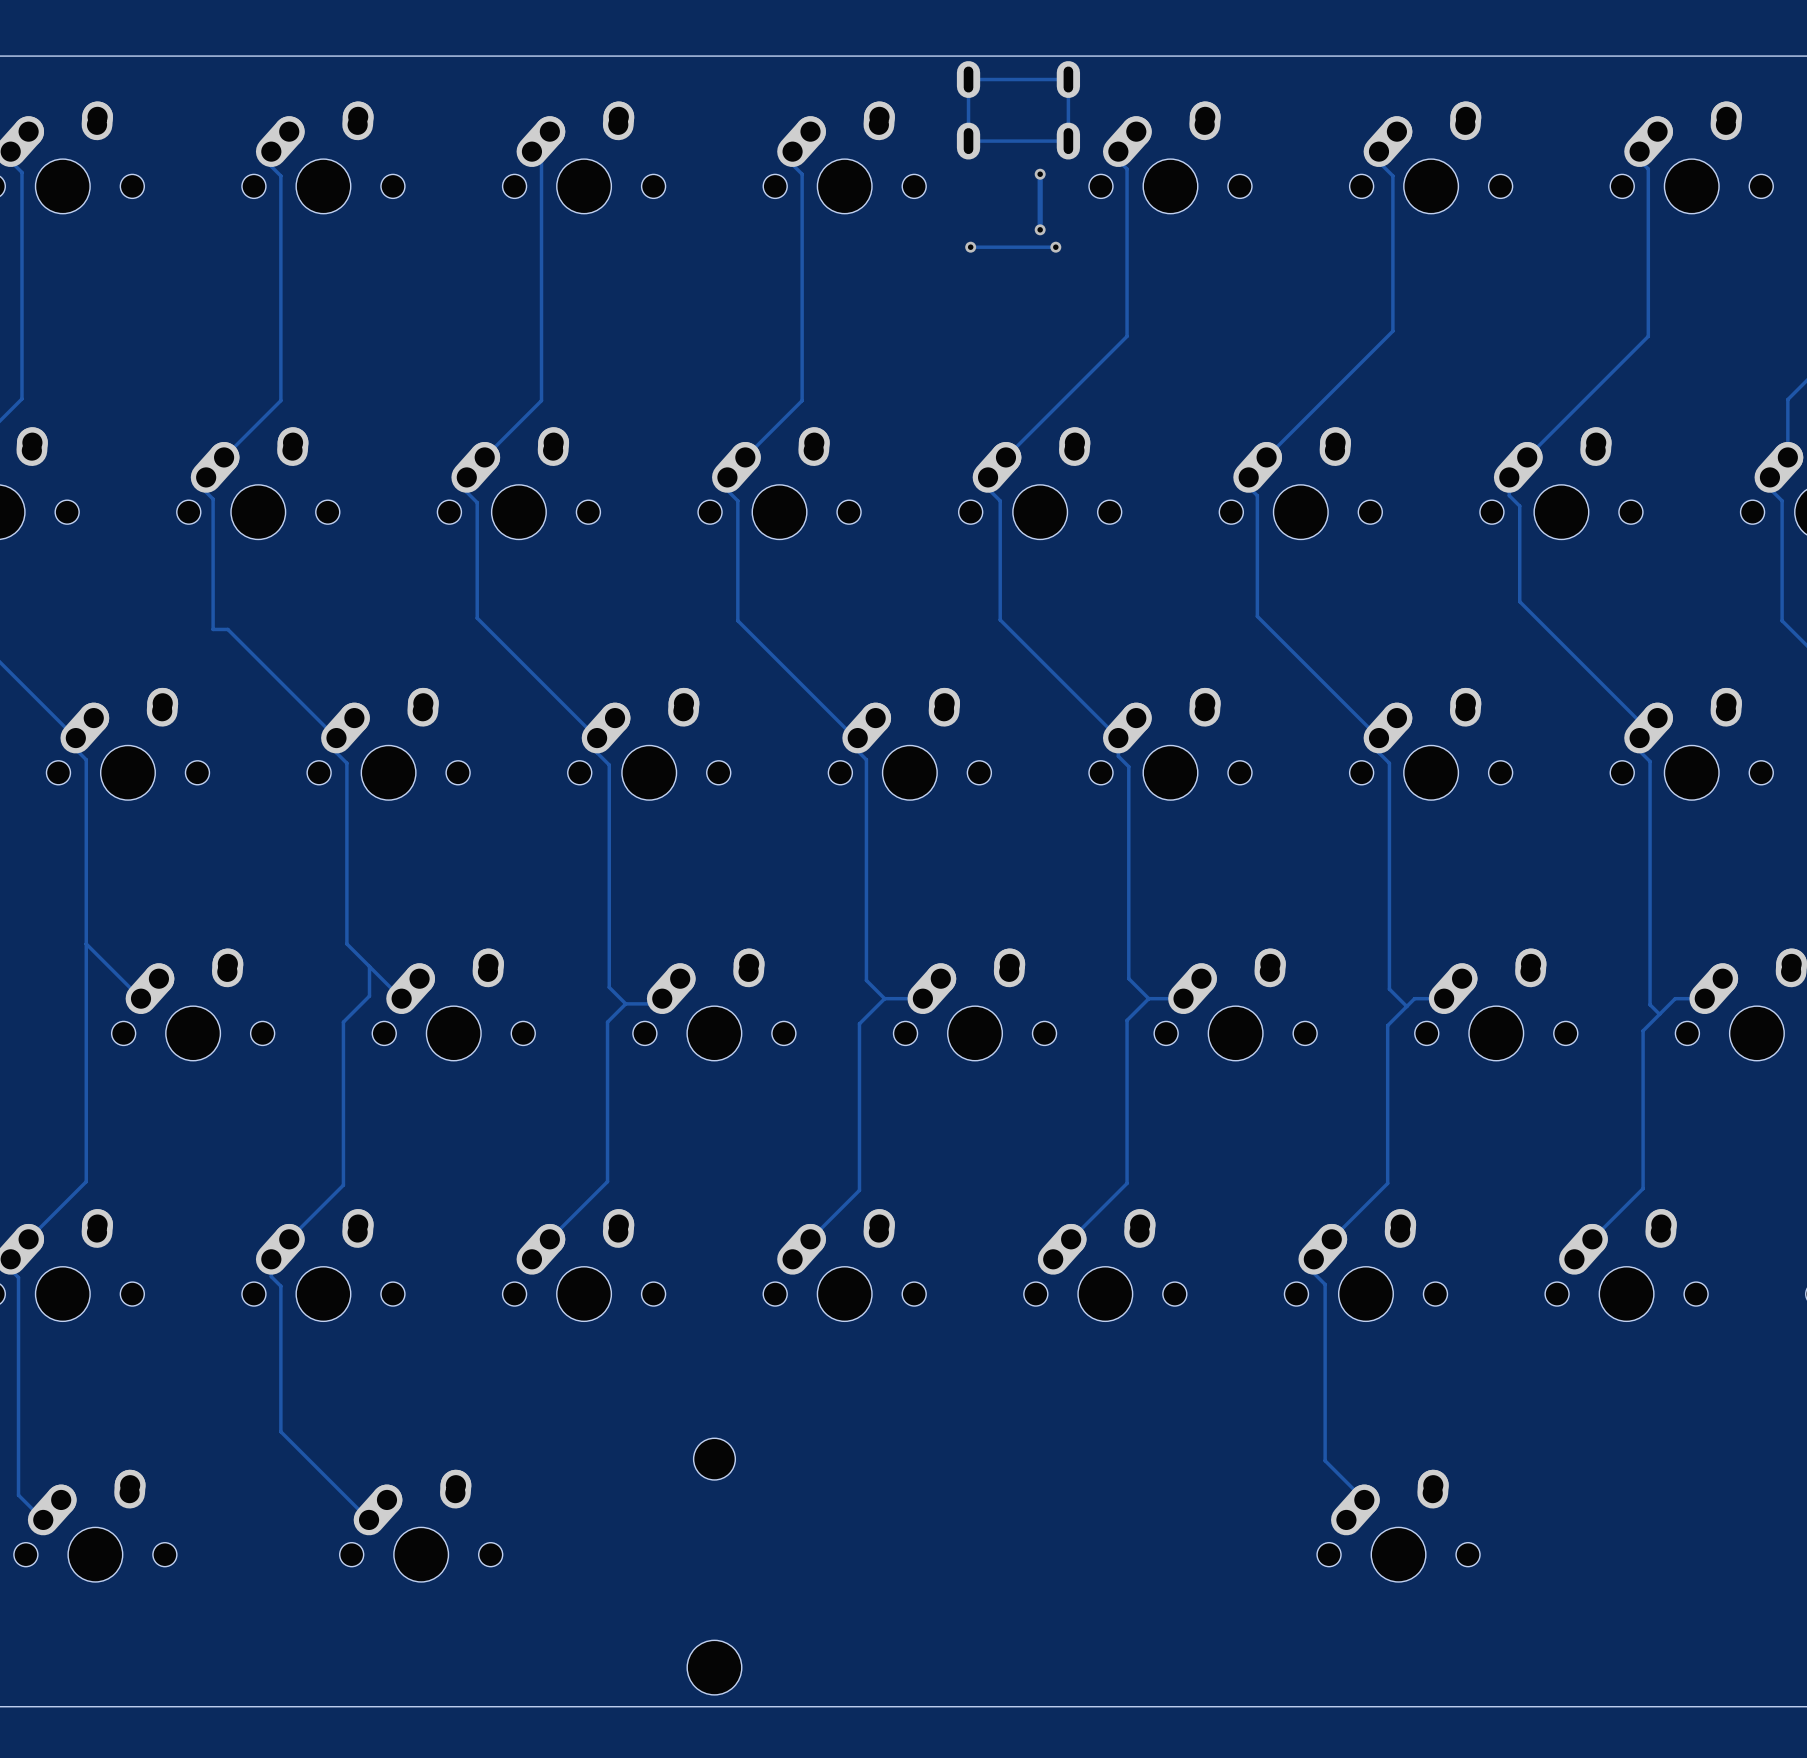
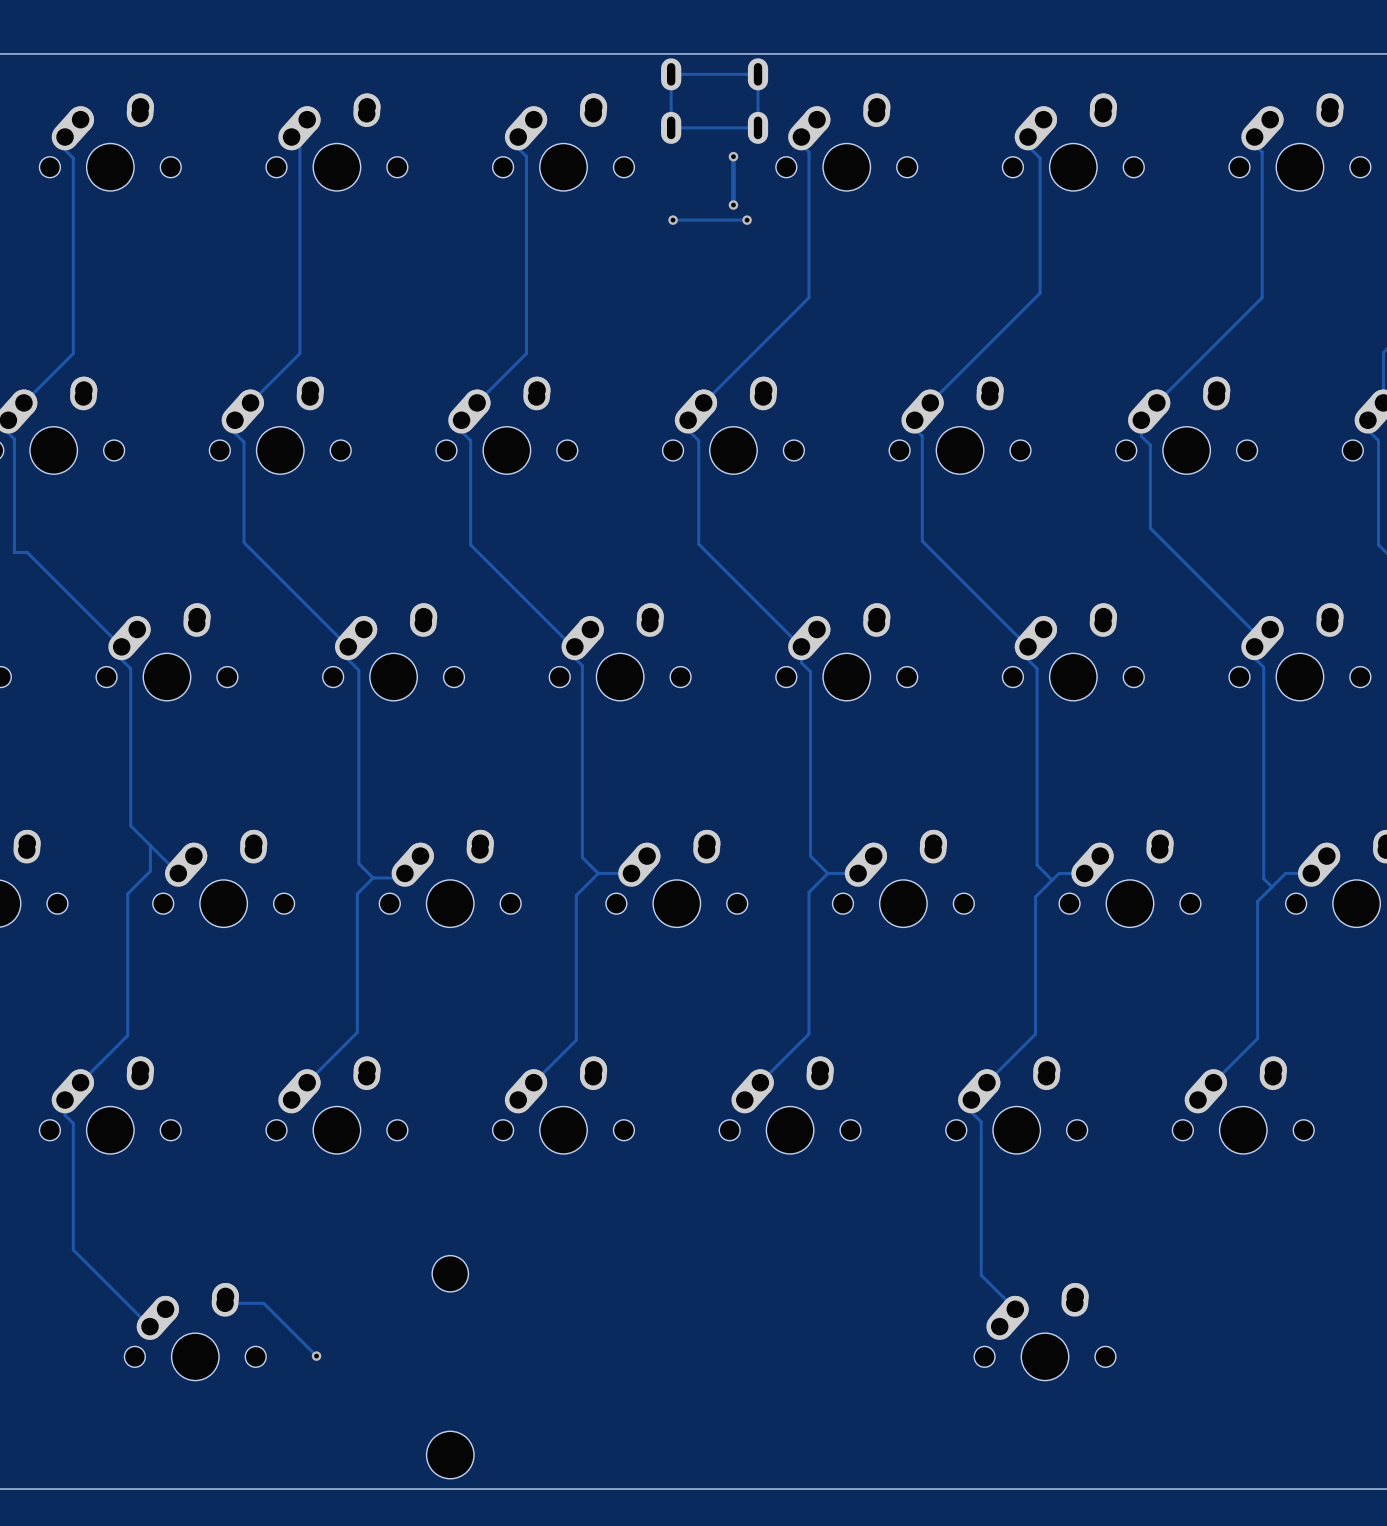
track: none -> (225, 1303) (263, 1303) (316, 1356)
via: none -> (316, 1356)

